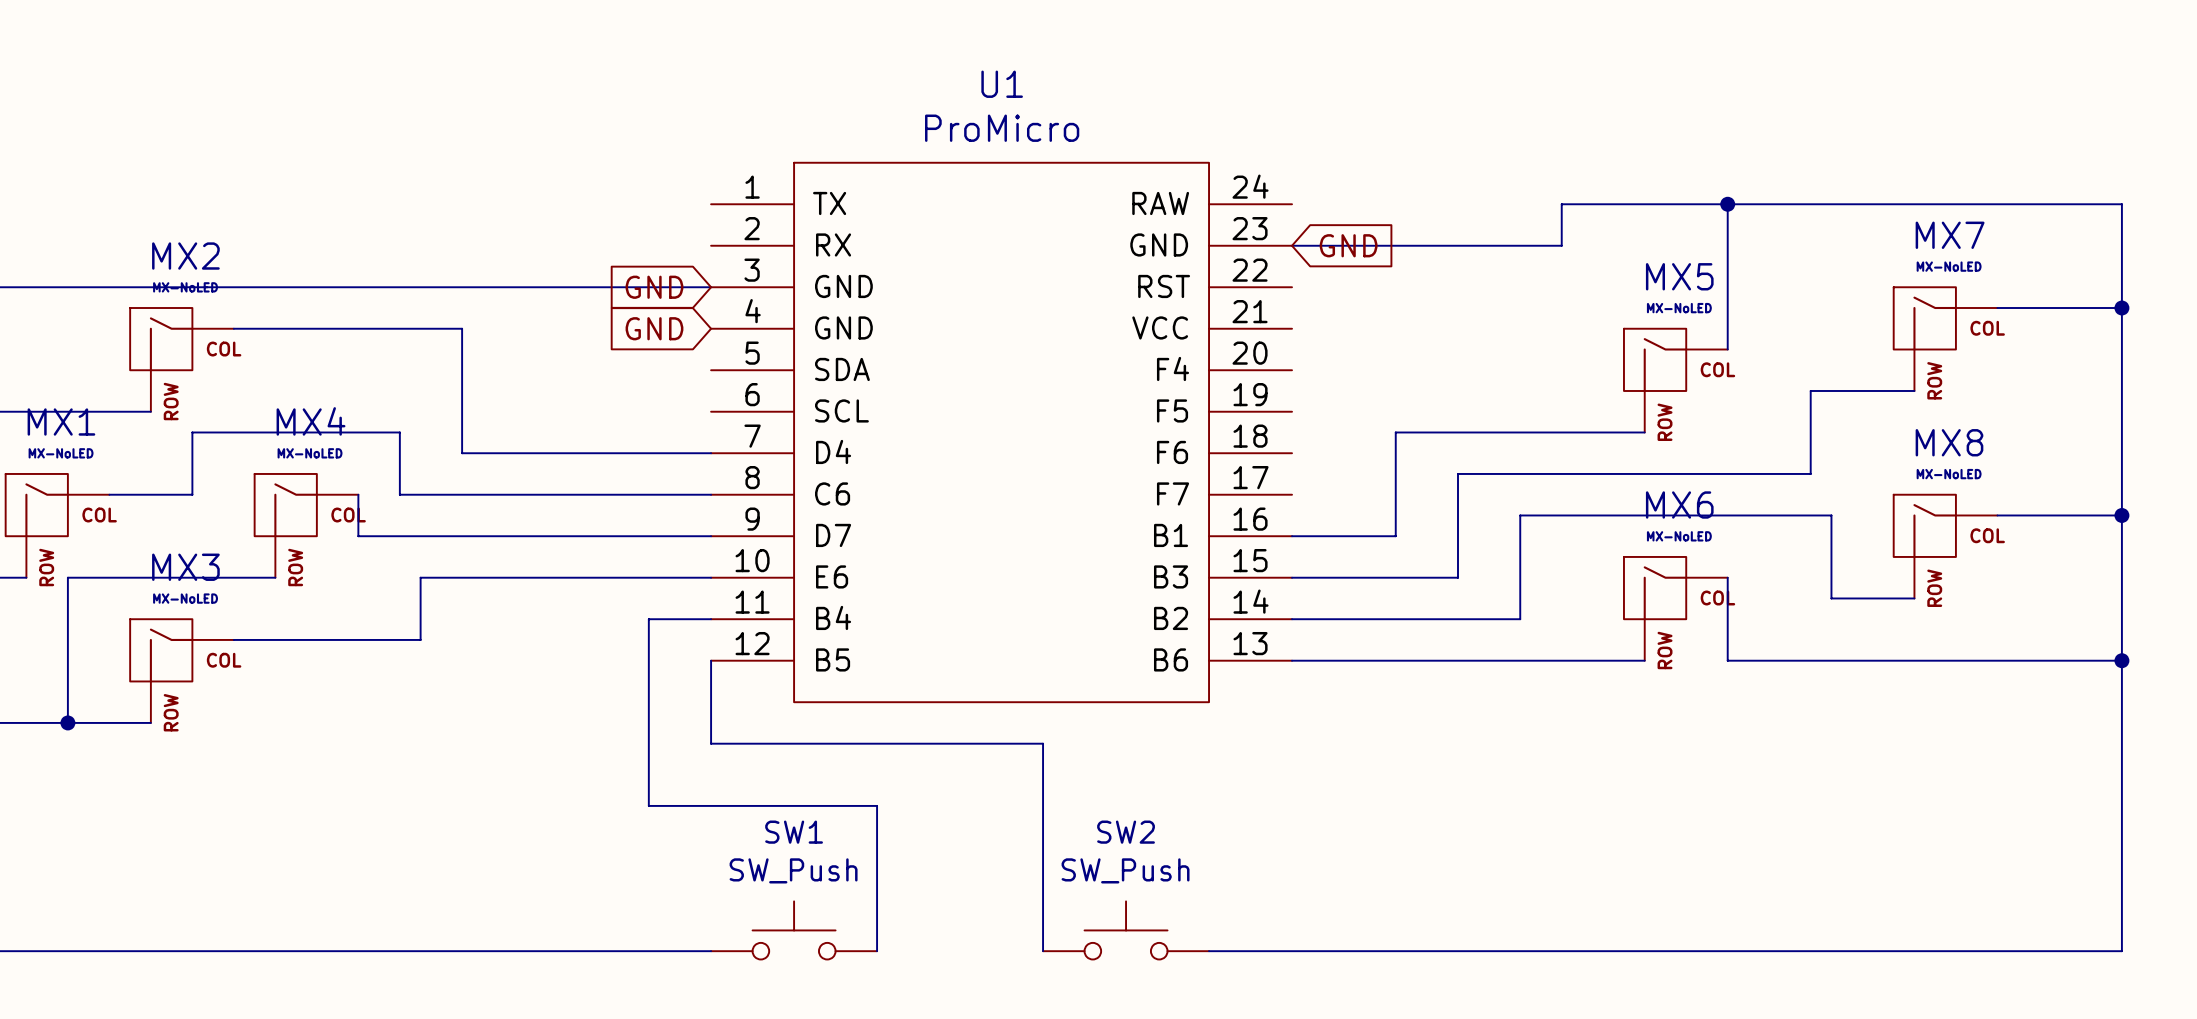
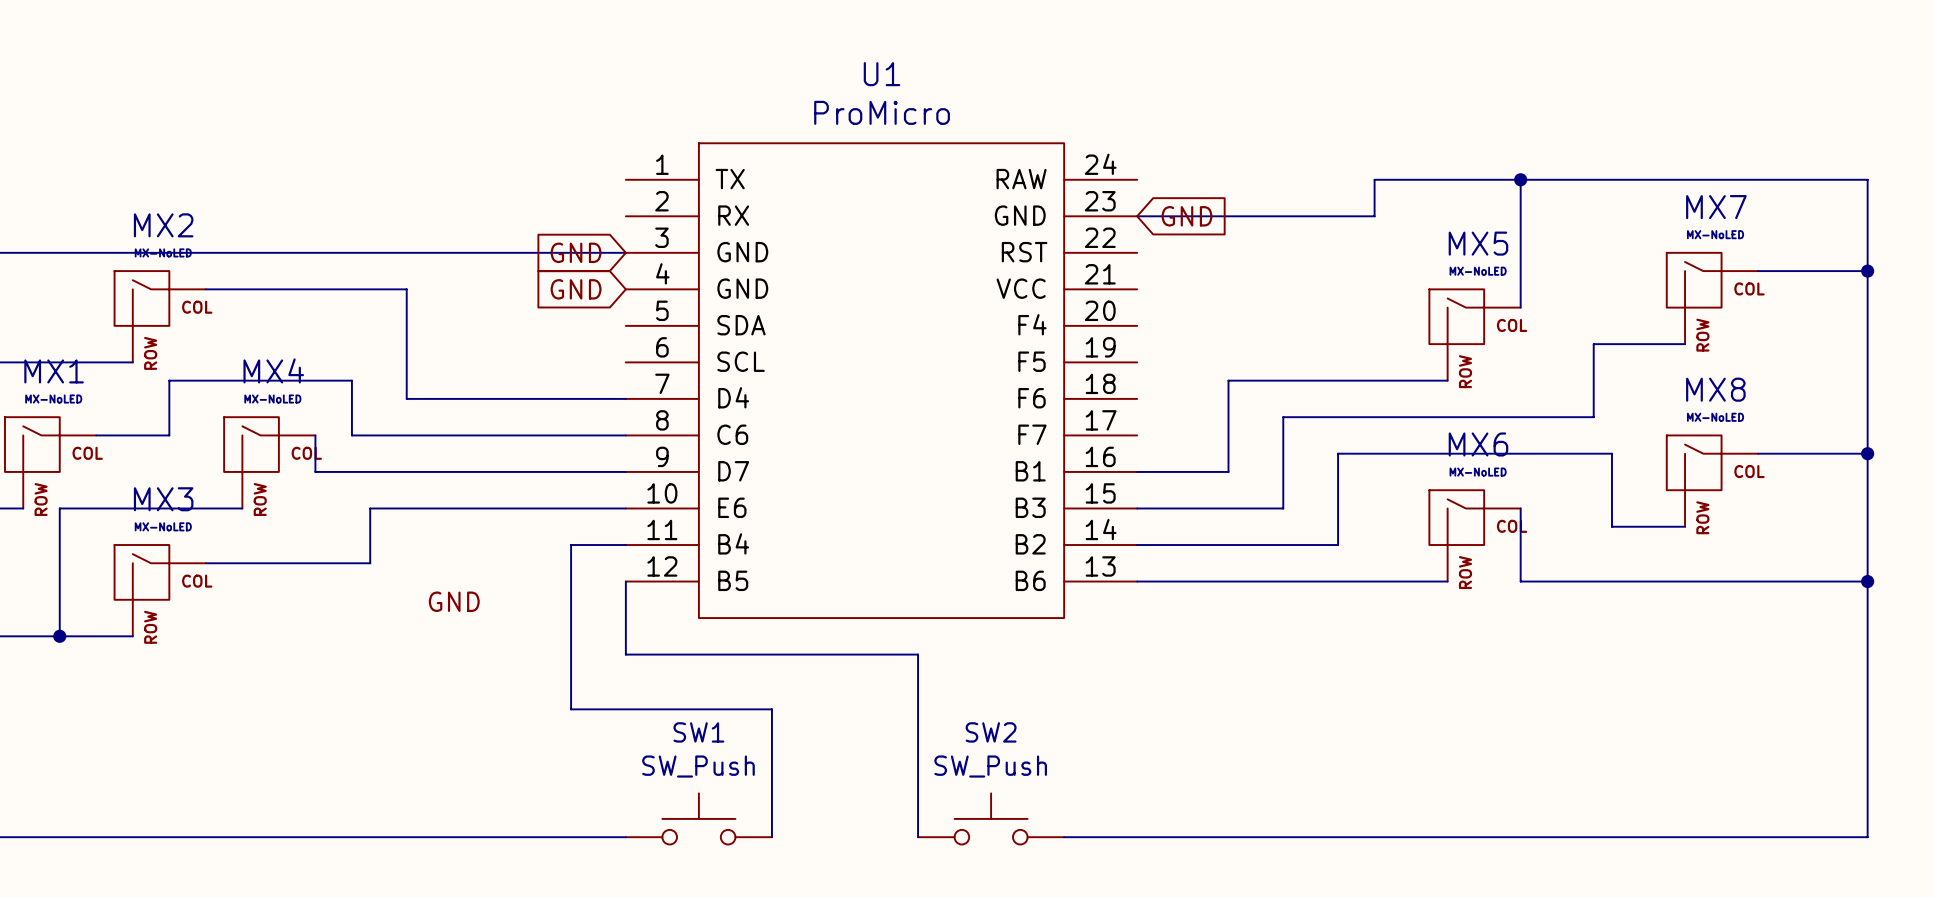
label: none -> GND (454, 601)

